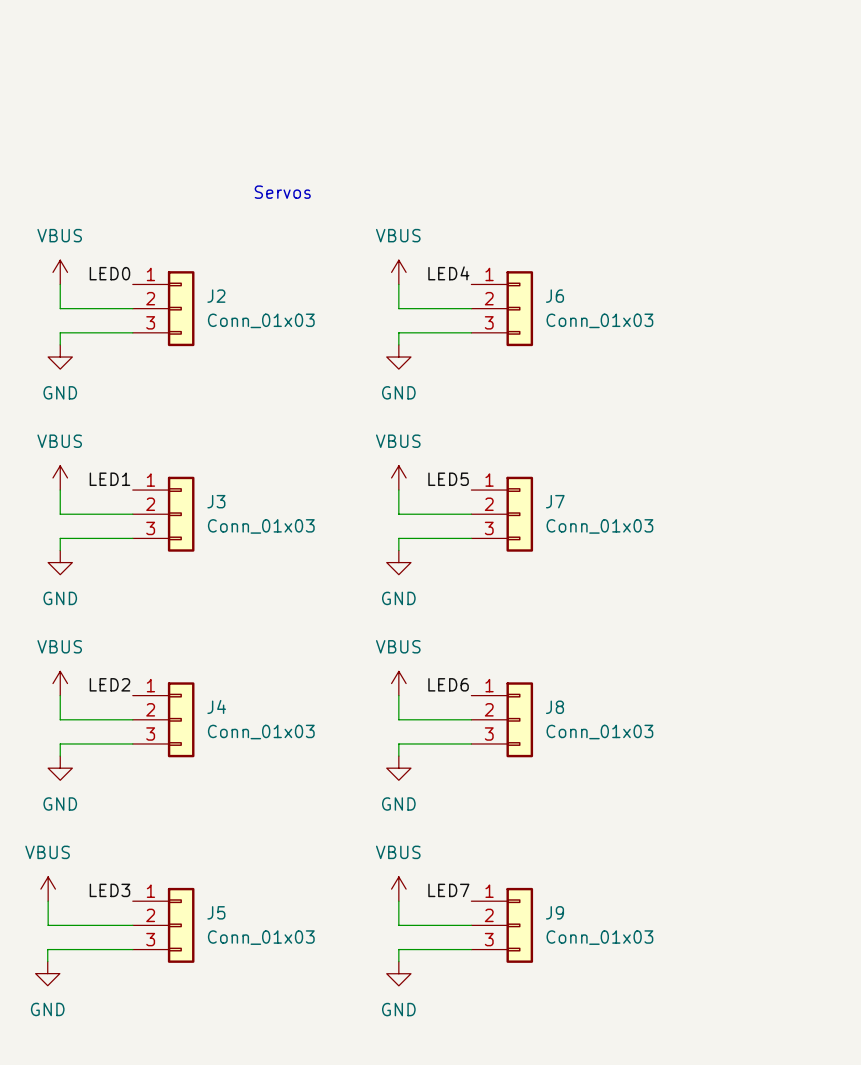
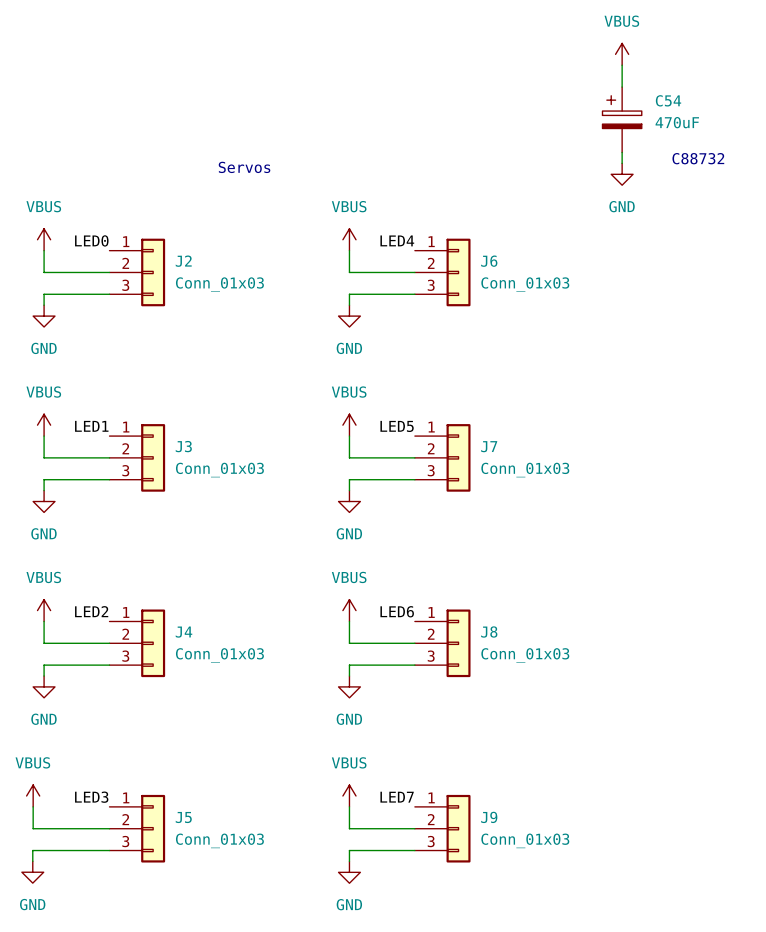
power symbol: none -> VBUS (622, 54)
wire: none -> (622, 65) (622, 87)
C54: none -> 470uF (622, 119)
wire: none -> (622, 152) (622, 163)
text: none -> C88732 (698, 158)
power symbol: none -> GND (622, 174)

